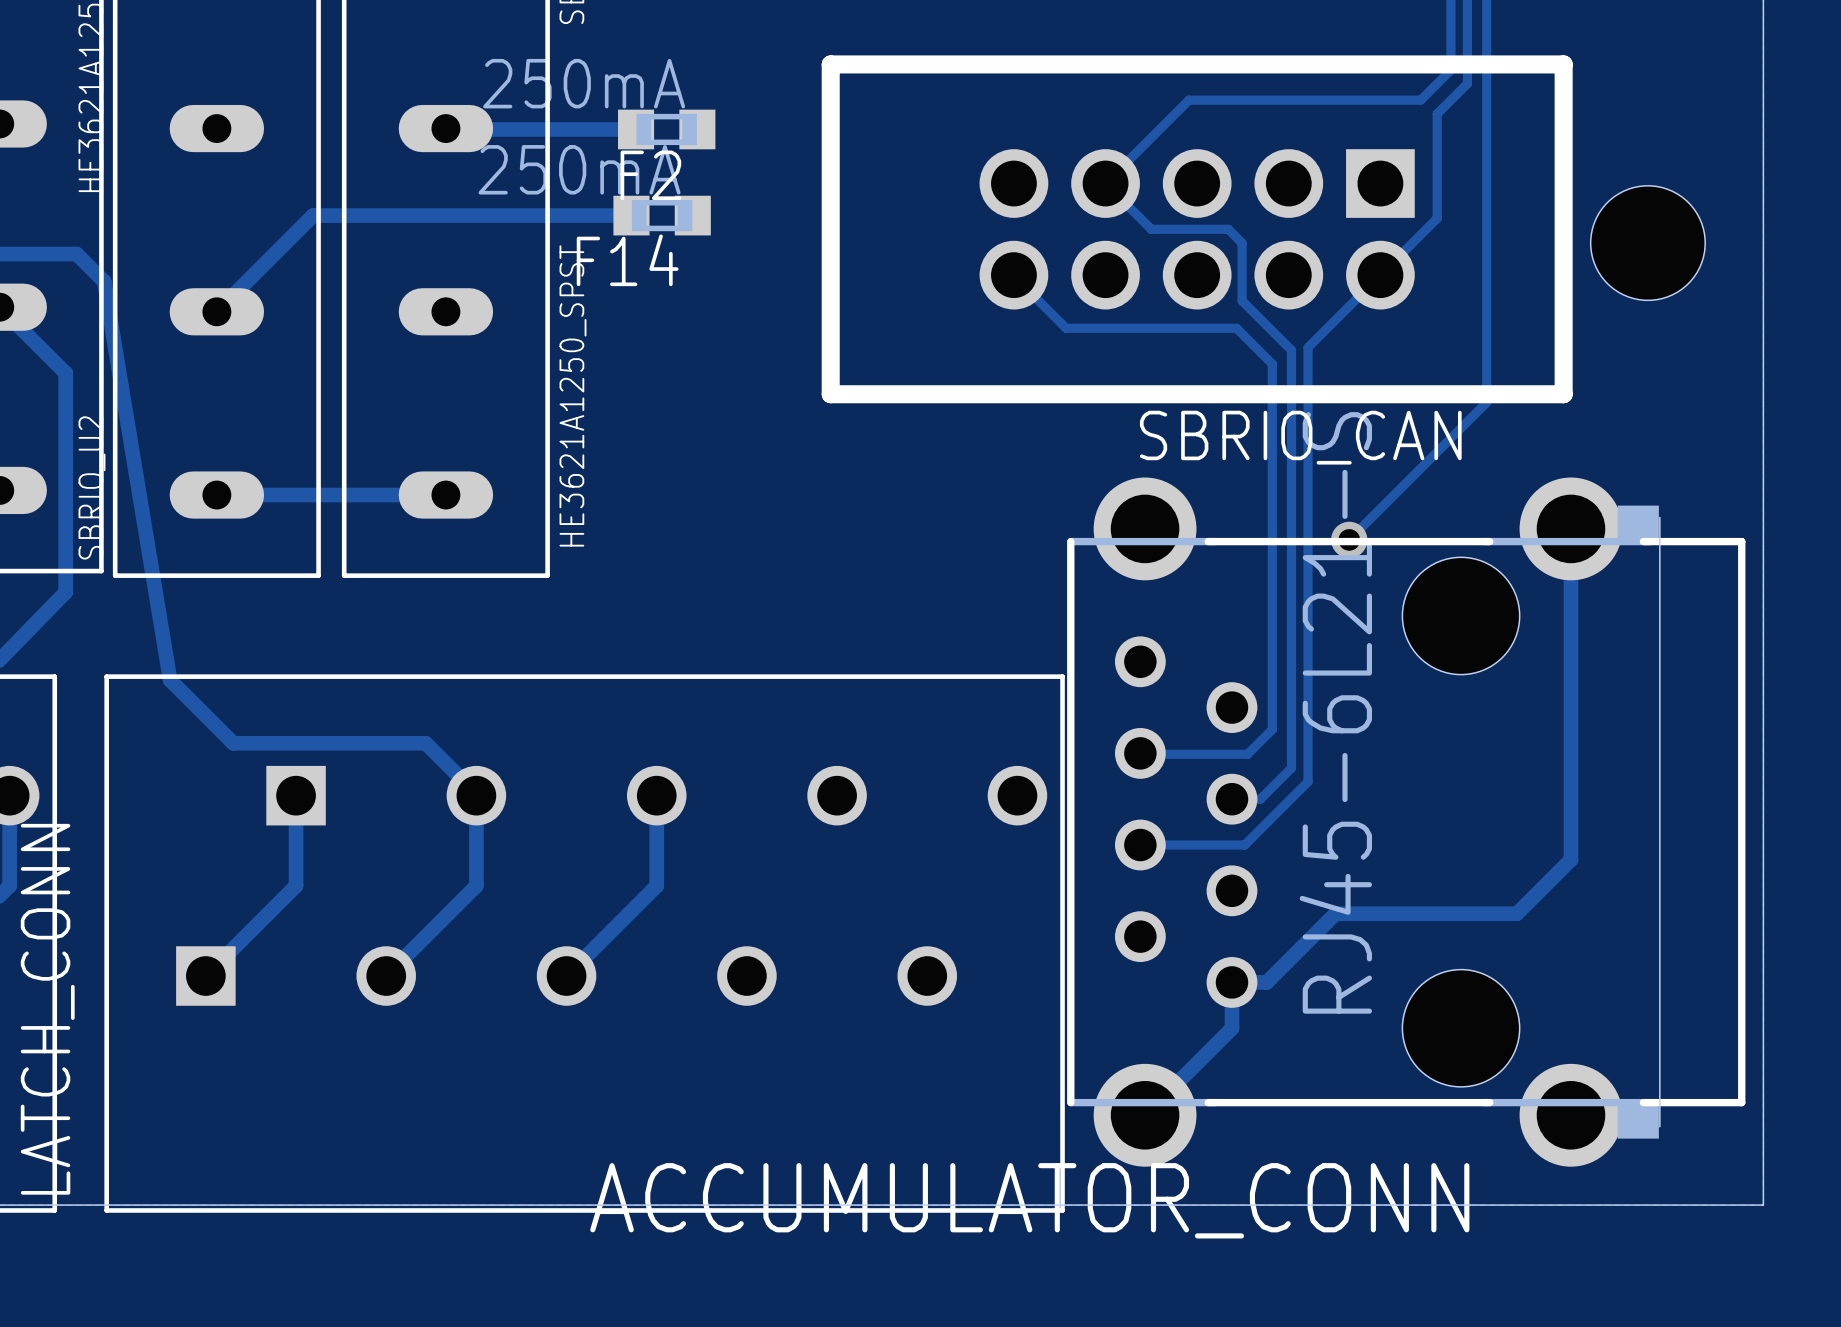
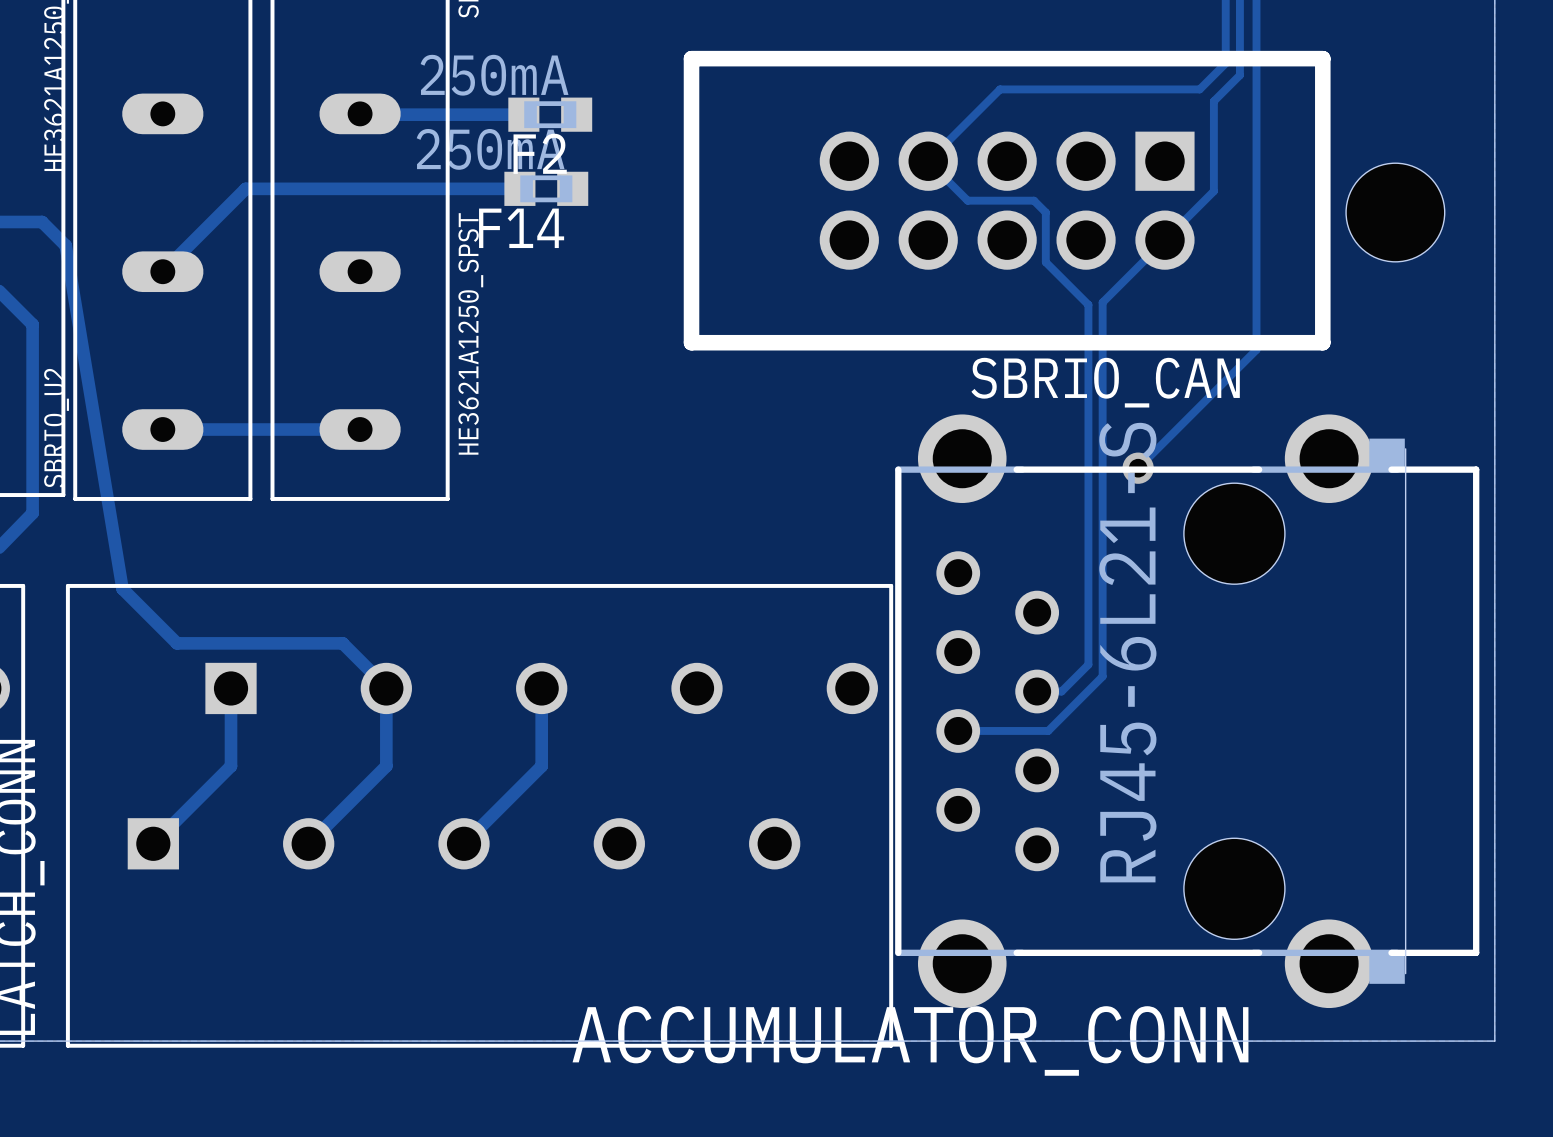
track: (1013, 275) (1066, 328) (1236, 328) (1272, 364) (1272, 729) (1247, 754) (1140, 753) -> none
track: (1570, 528) (1570, 859) (1516, 913) (1335, 913) (1266, 982) (1231, 982) (1231, 1028) (1145, 1115) -> none

